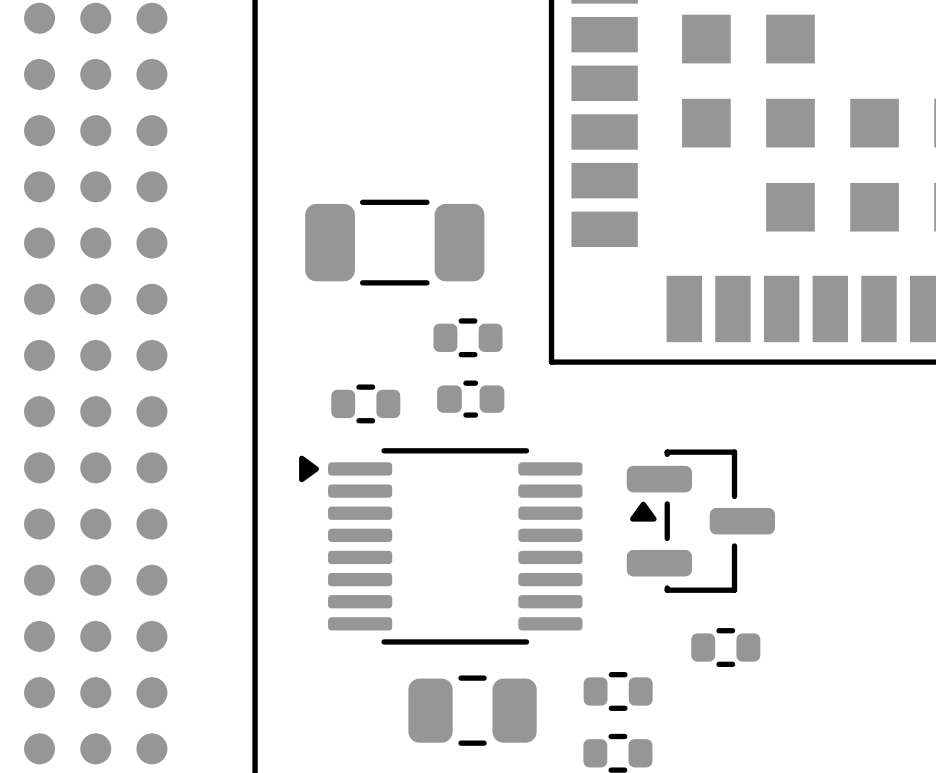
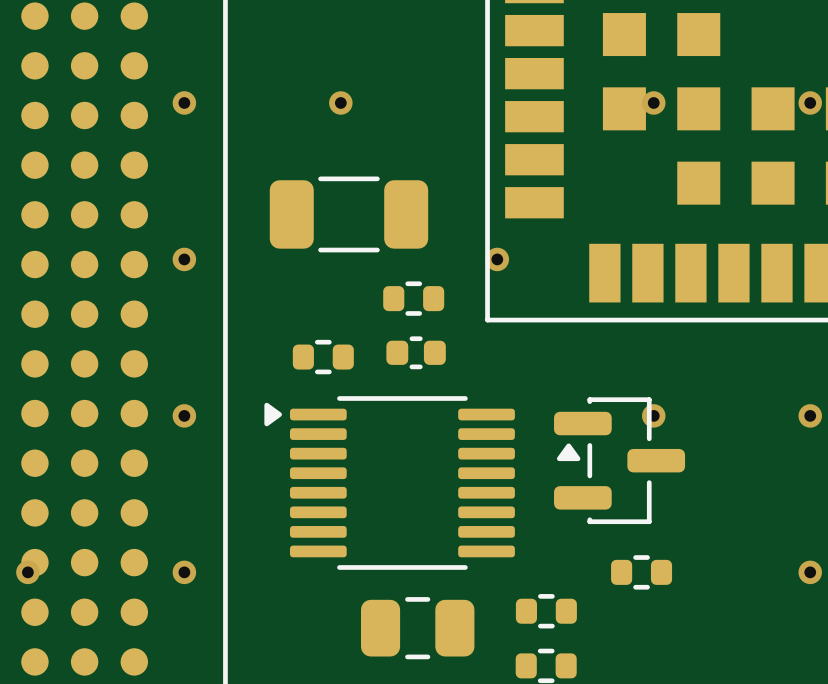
via: none -> (184, 102)
via: none -> (340, 102)
via: none -> (653, 102)
via: none -> (810, 102)
via: none -> (184, 259)
via: none -> (497, 259)
via: none -> (184, 415)
via: none -> (653, 415)
via: none -> (810, 415)
via: none -> (27, 572)
via: none -> (184, 572)
via: none -> (810, 572)

